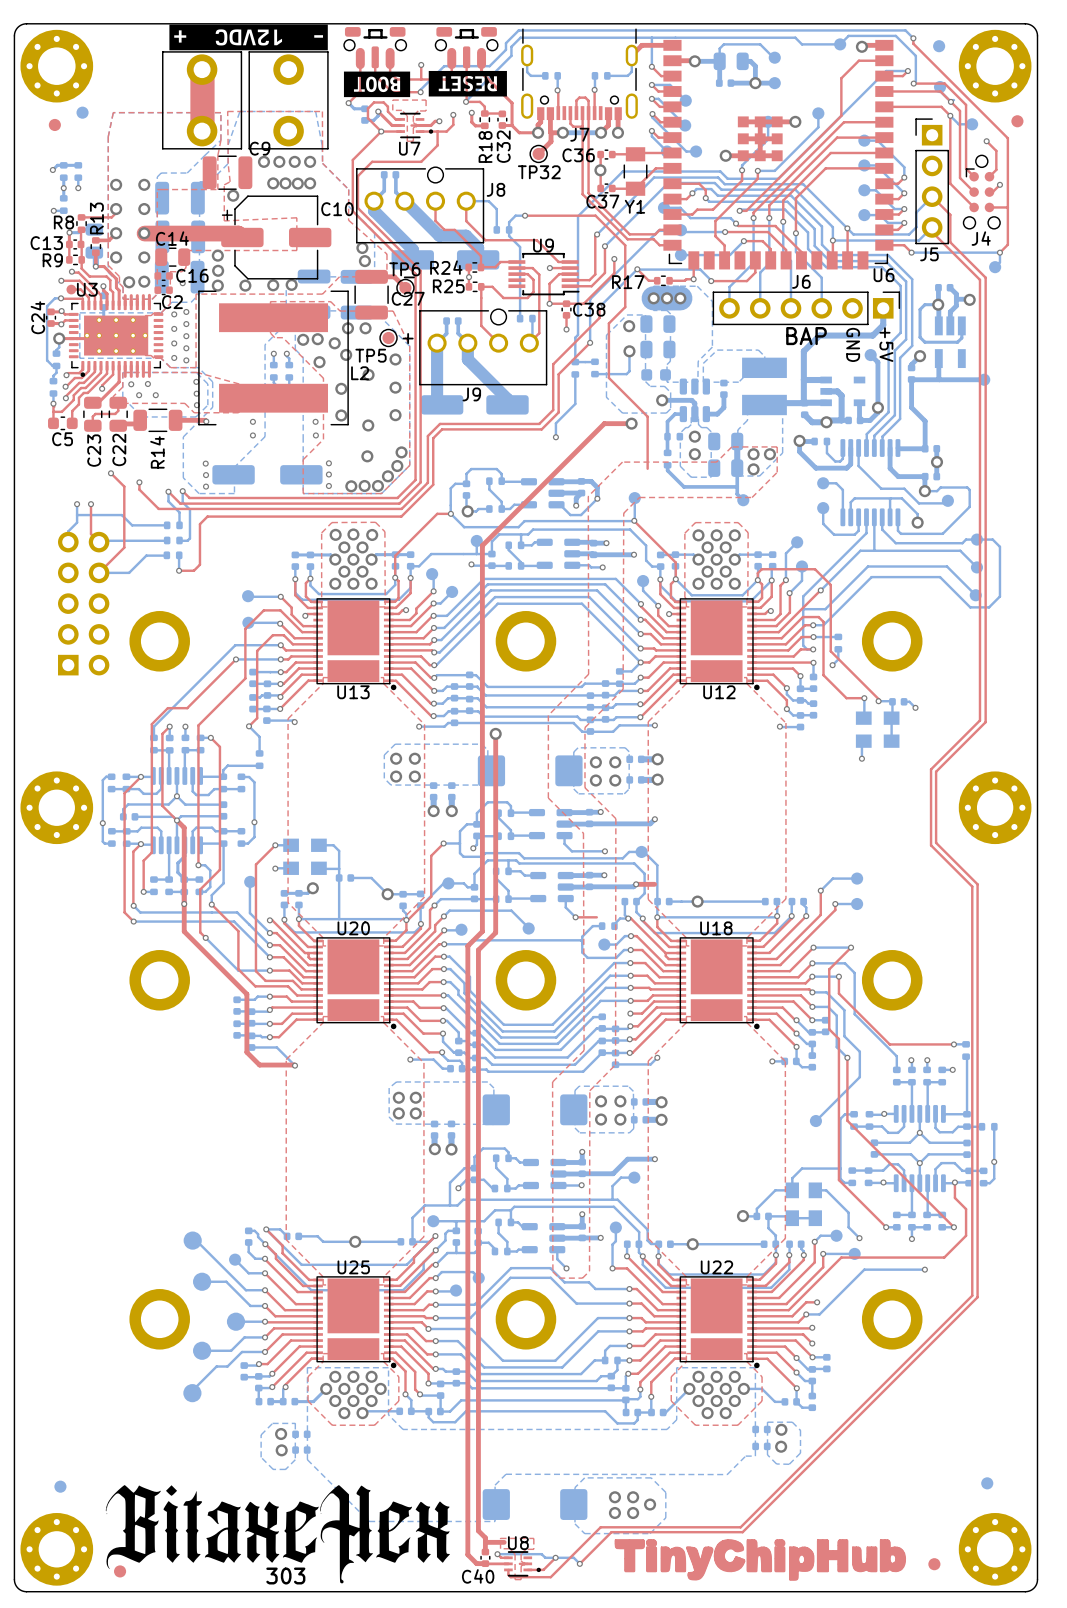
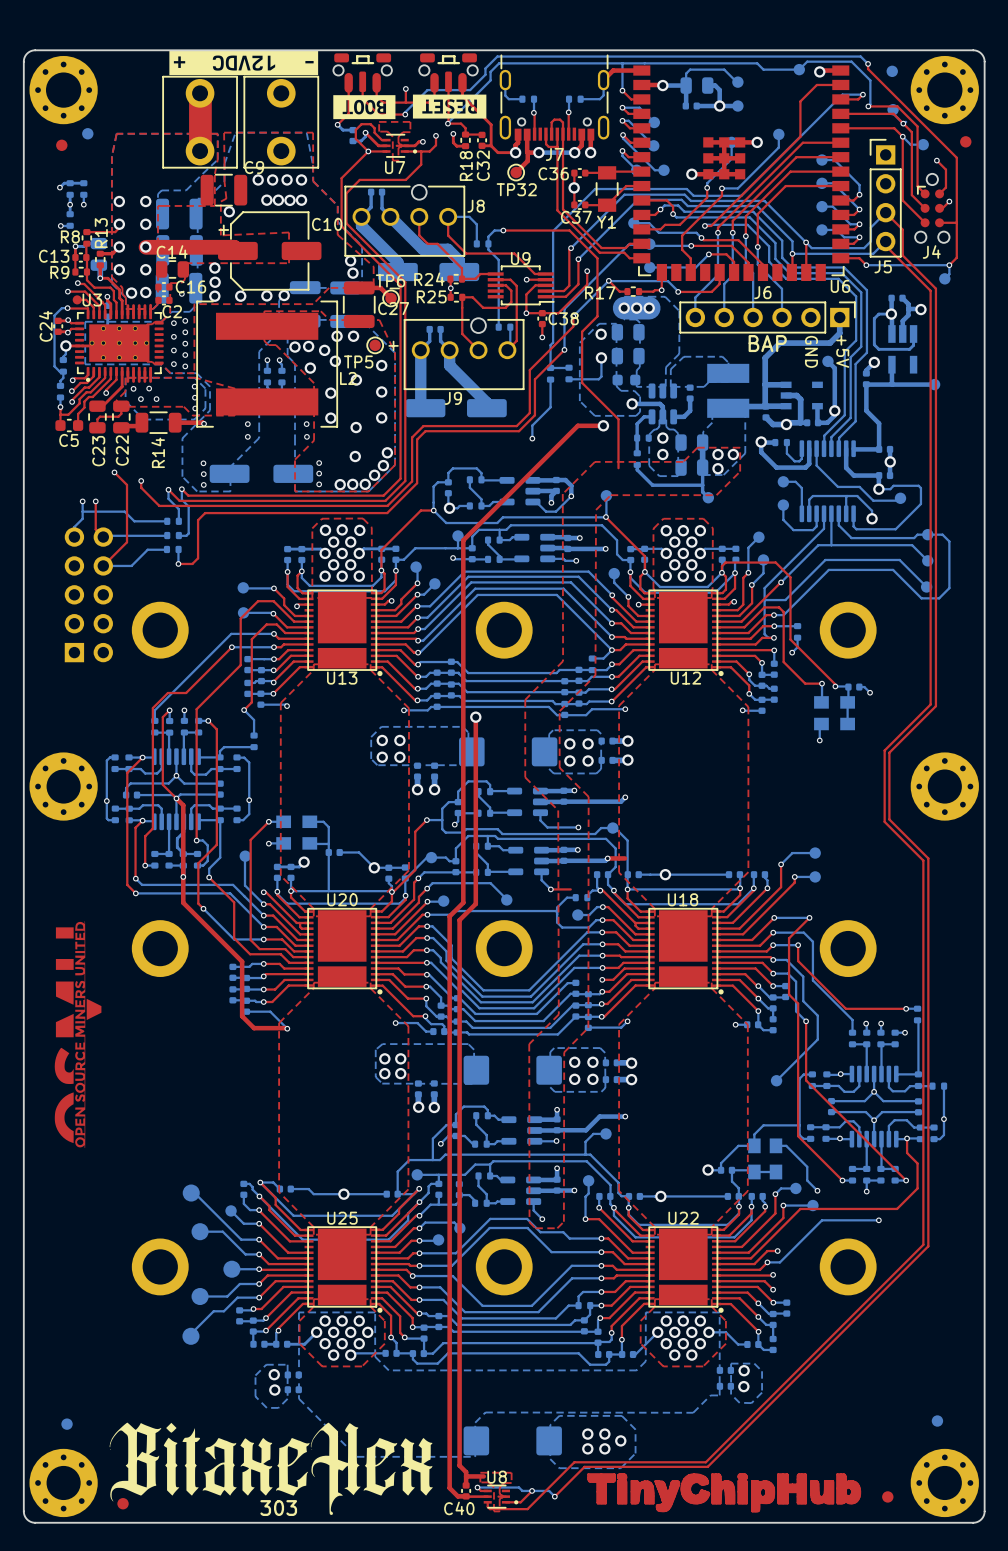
drawing: none -> [54, 921, 102, 1149]

